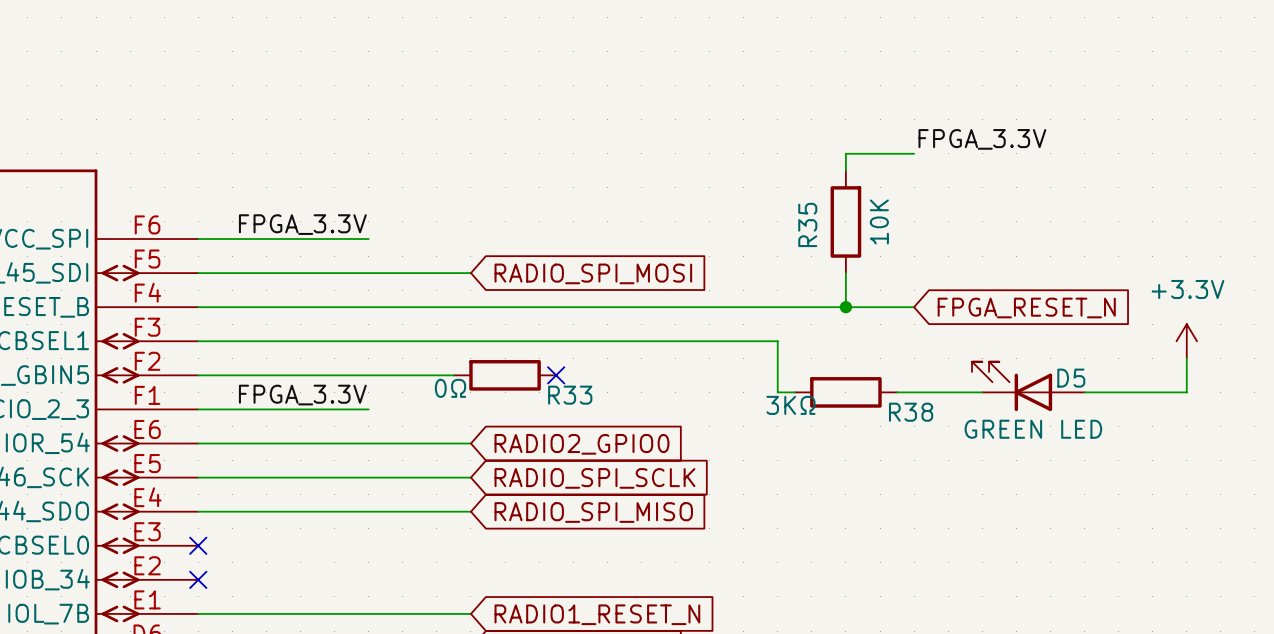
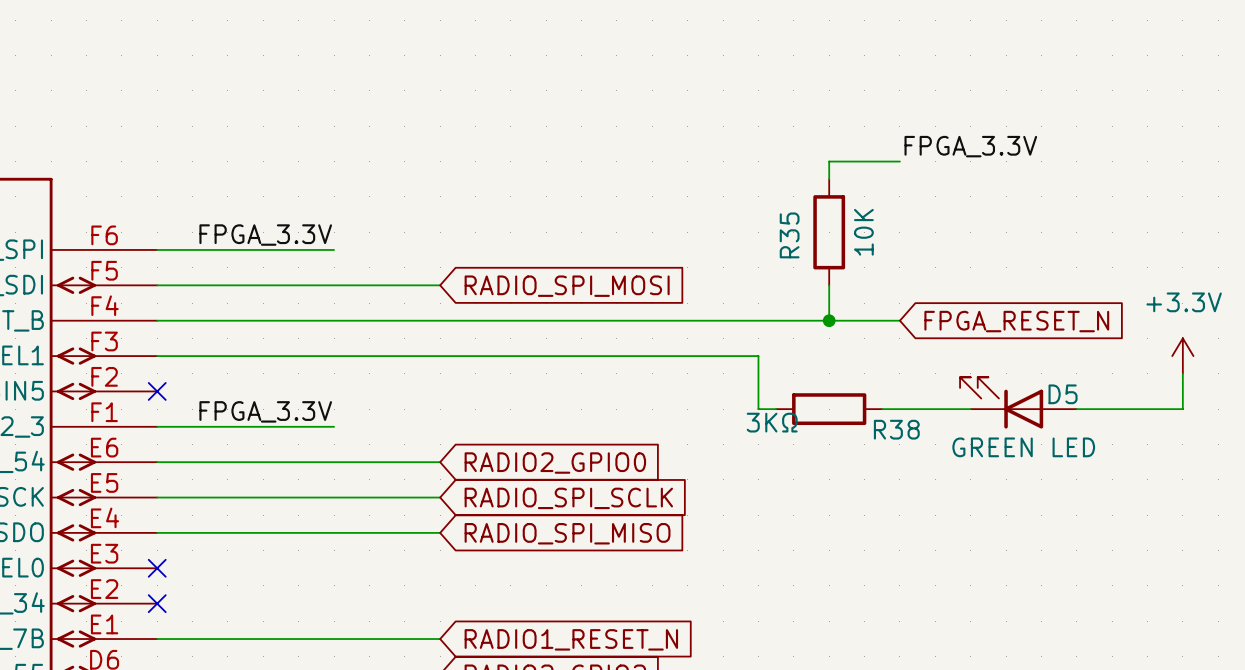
wire: (198, 375) (453, 375) -> none
no-connect mark: none -> (157, 391)
R33: 0Ω (505, 375) -> none
no-connect mark: (556, 375) -> none

